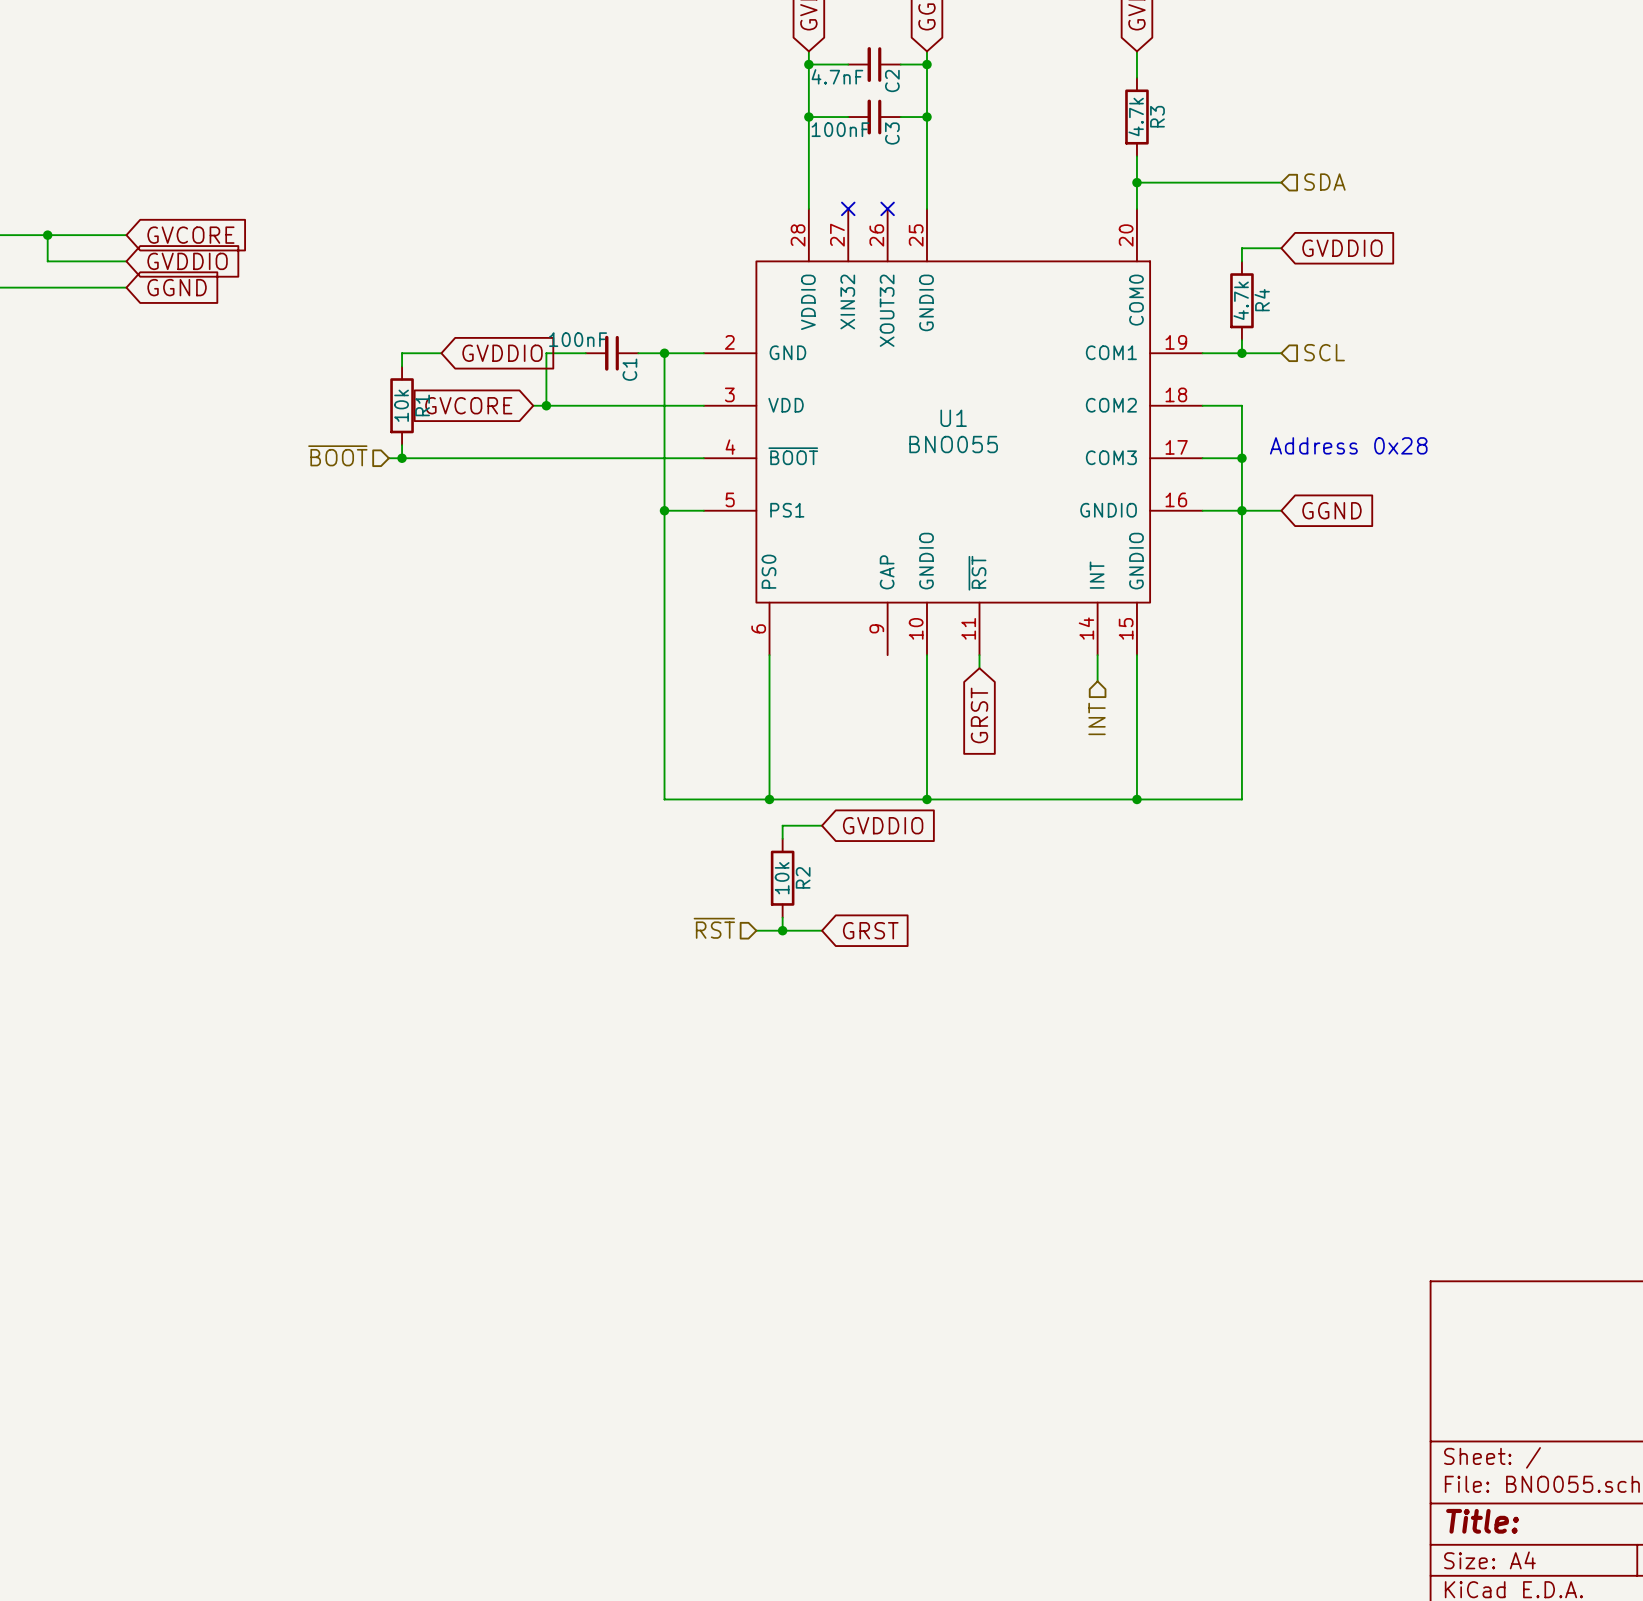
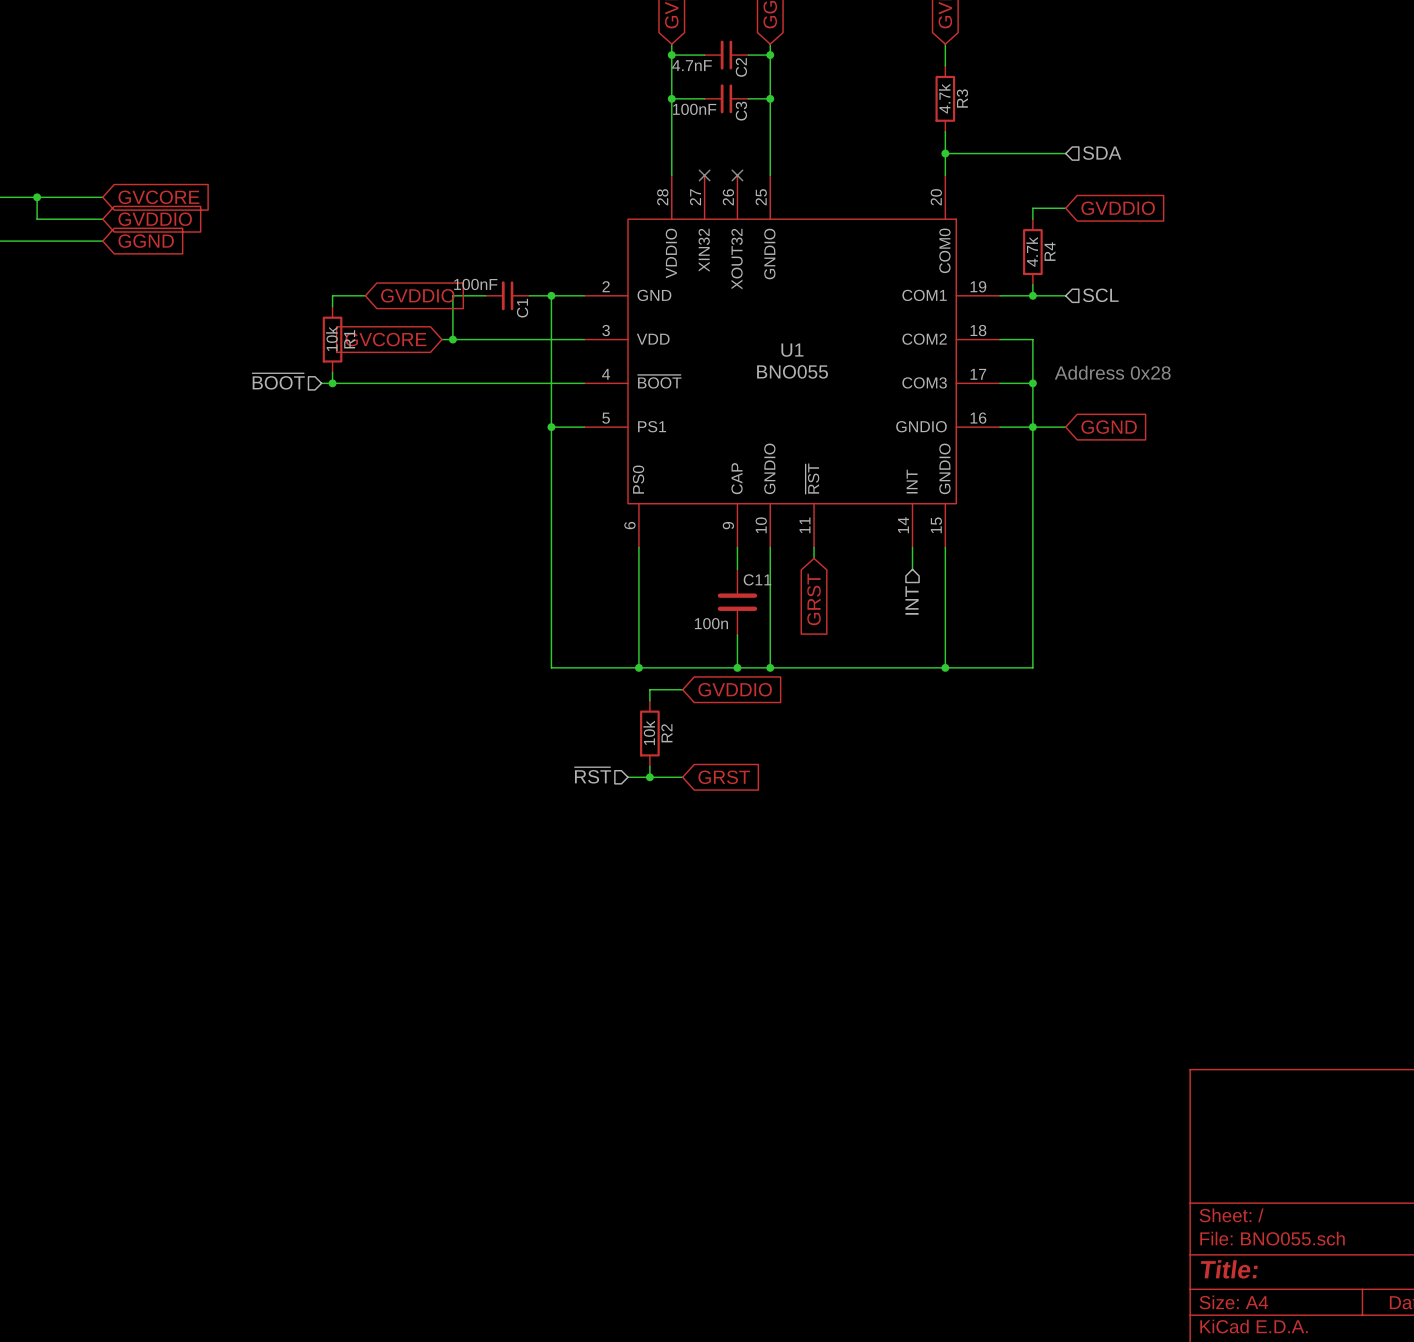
wire: none -> (737, 547) (737, 569)
C11: none -> 100n (737, 602)
wire: none -> (737, 635) (737, 667)
junction: none -> (737, 667)

